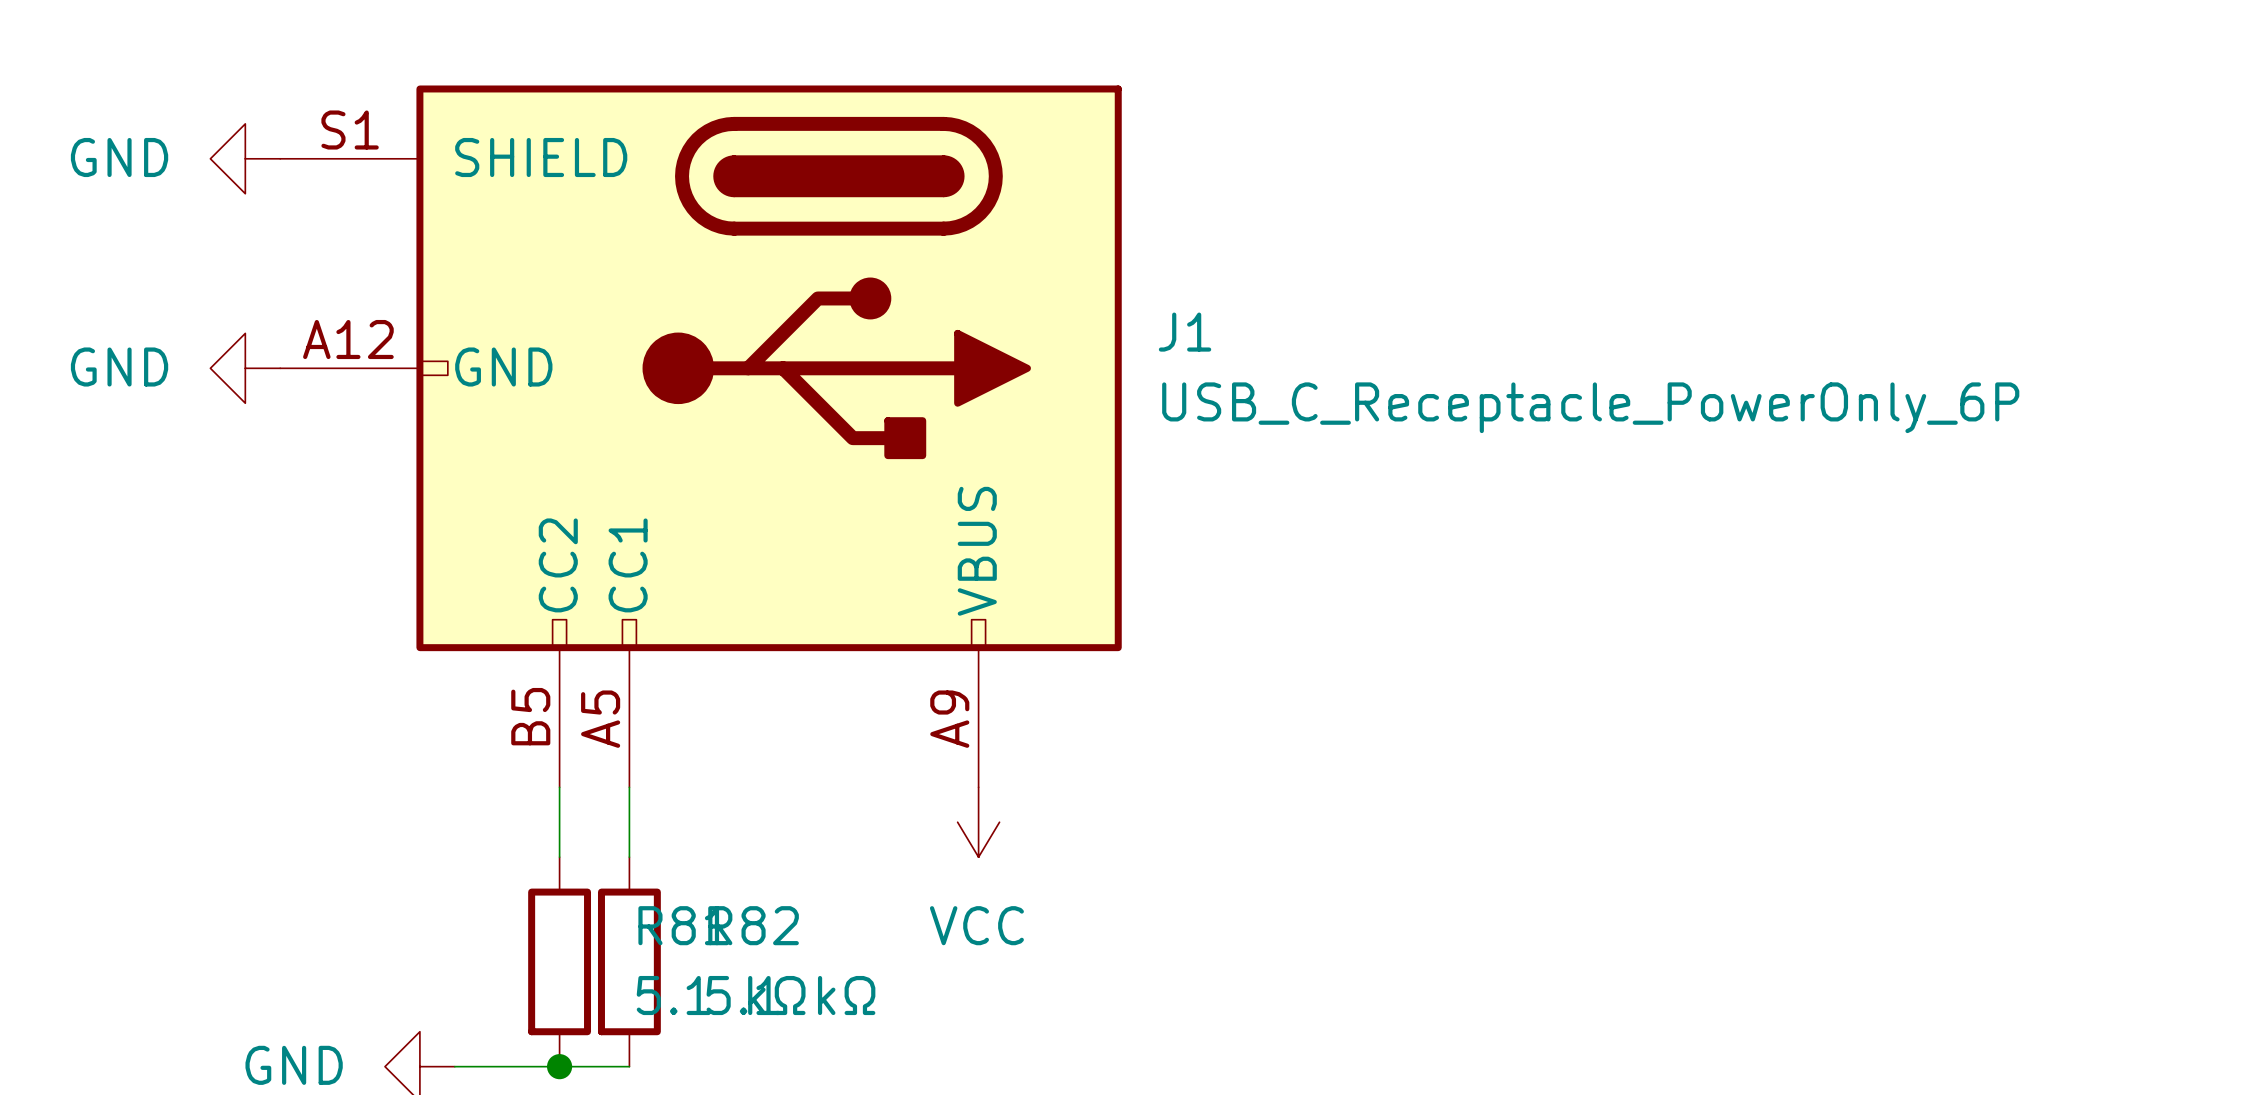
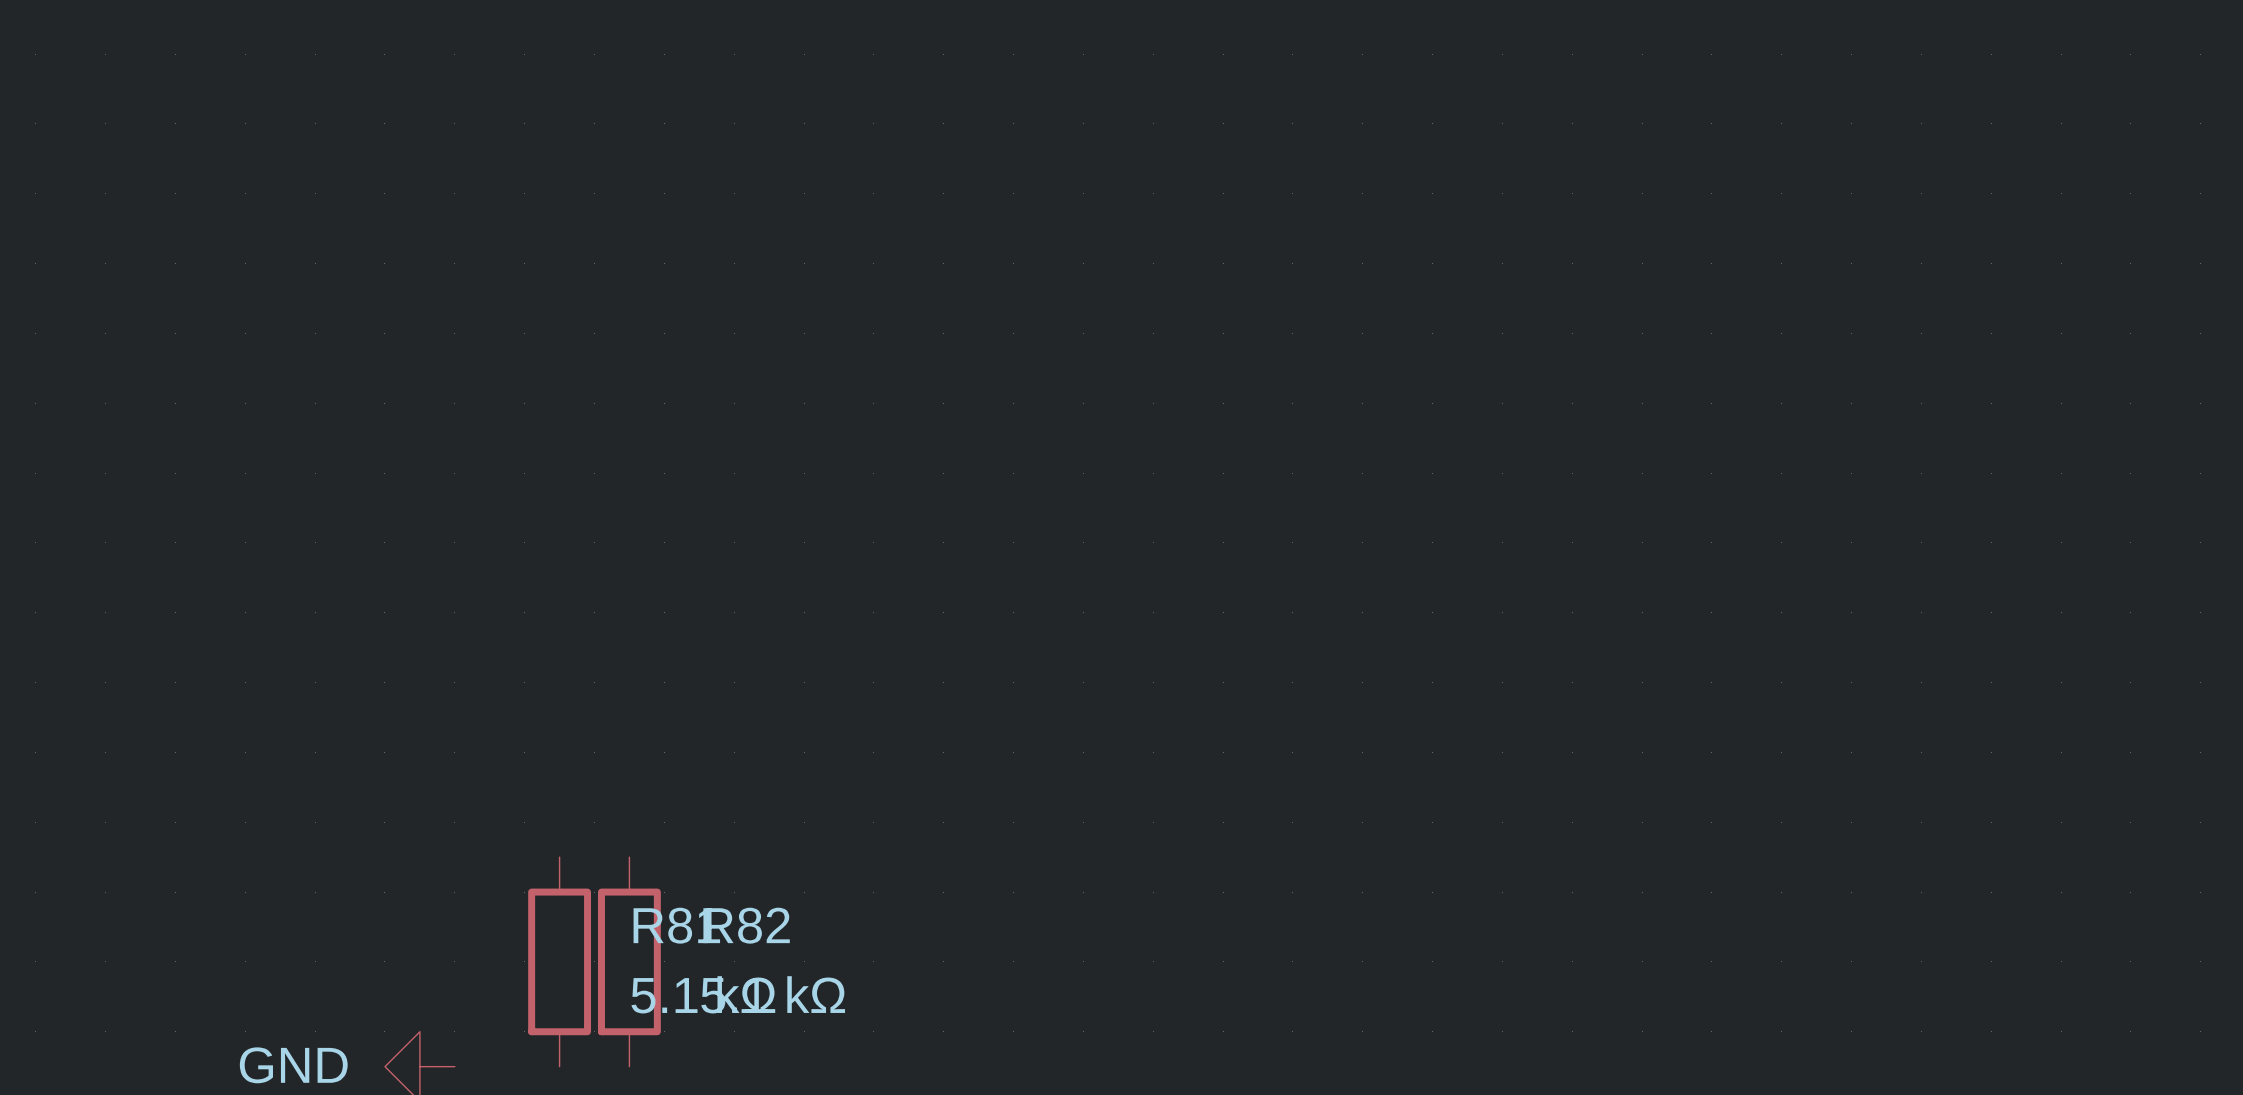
power symbol: GND (245, 158) -> none
power symbol: GND (245, 368) -> none
J1: USB_C_Receptacle_PowerOnly_6P (700, 436) -> none
wire: (559, 787) (559, 857) -> none
wire: (629, 787) (629, 857) -> none
power symbol: VCC (978, 822) -> none
wire: (454, 1066) (629, 1066) -> none
junction: (559, 1066) -> none

